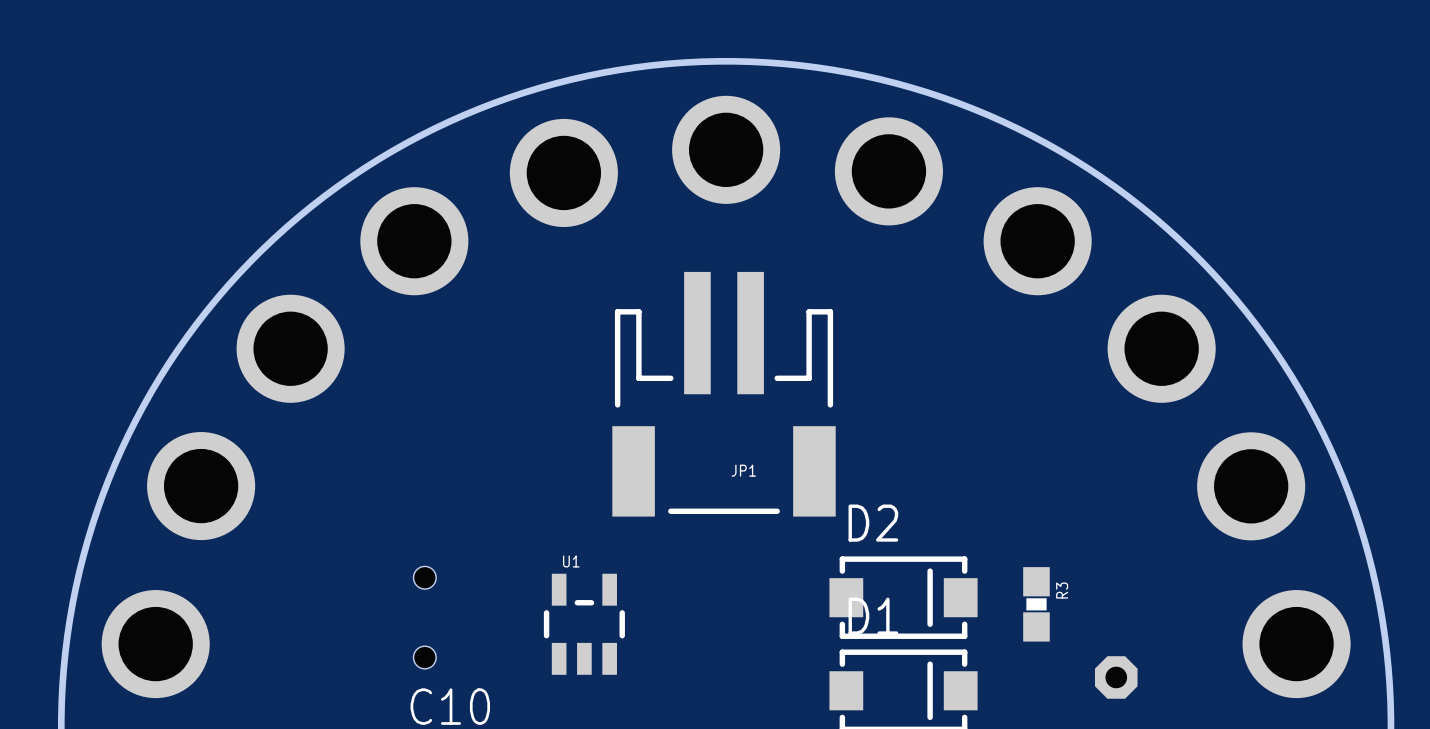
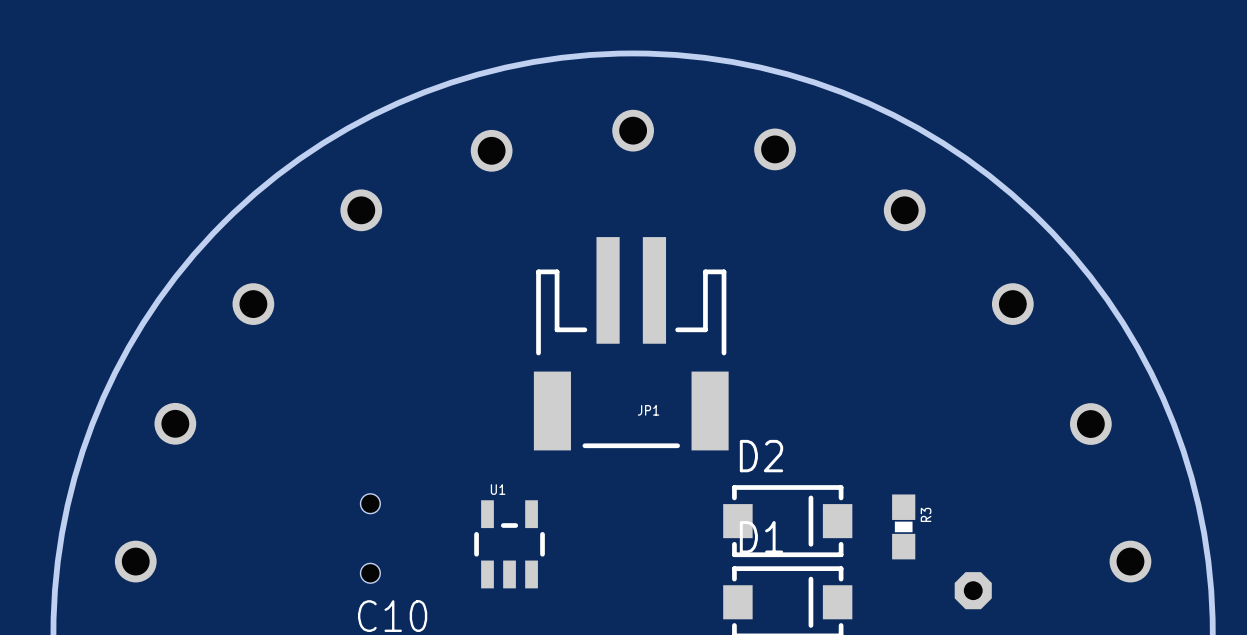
part footprint: [672, 95, 781, 204] -> [612, 109, 654, 152]
part footprint: [834, 117, 943, 226] -> [754, 128, 796, 171]
part footprint: [509, 118, 618, 228] -> [470, 129, 513, 172]
part footprint: [360, 187, 469, 296] -> [340, 189, 383, 232]
part footprint: [983, 187, 1092, 296] -> [883, 189, 926, 232]
part footprint: [236, 294, 345, 403] -> [232, 283, 275, 325]
part footprint: [1107, 294, 1216, 403] -> [991, 283, 1034, 325]
part footprint: [147, 432, 256, 541] -> [154, 402, 197, 445]
part footprint: [1197, 432, 1306, 541] -> [1070, 403, 1112, 445]
part footprint: [101, 590, 210, 699] -> [114, 540, 157, 583]
part footprint: [1242, 590, 1351, 699] -> [1109, 540, 1152, 583]

